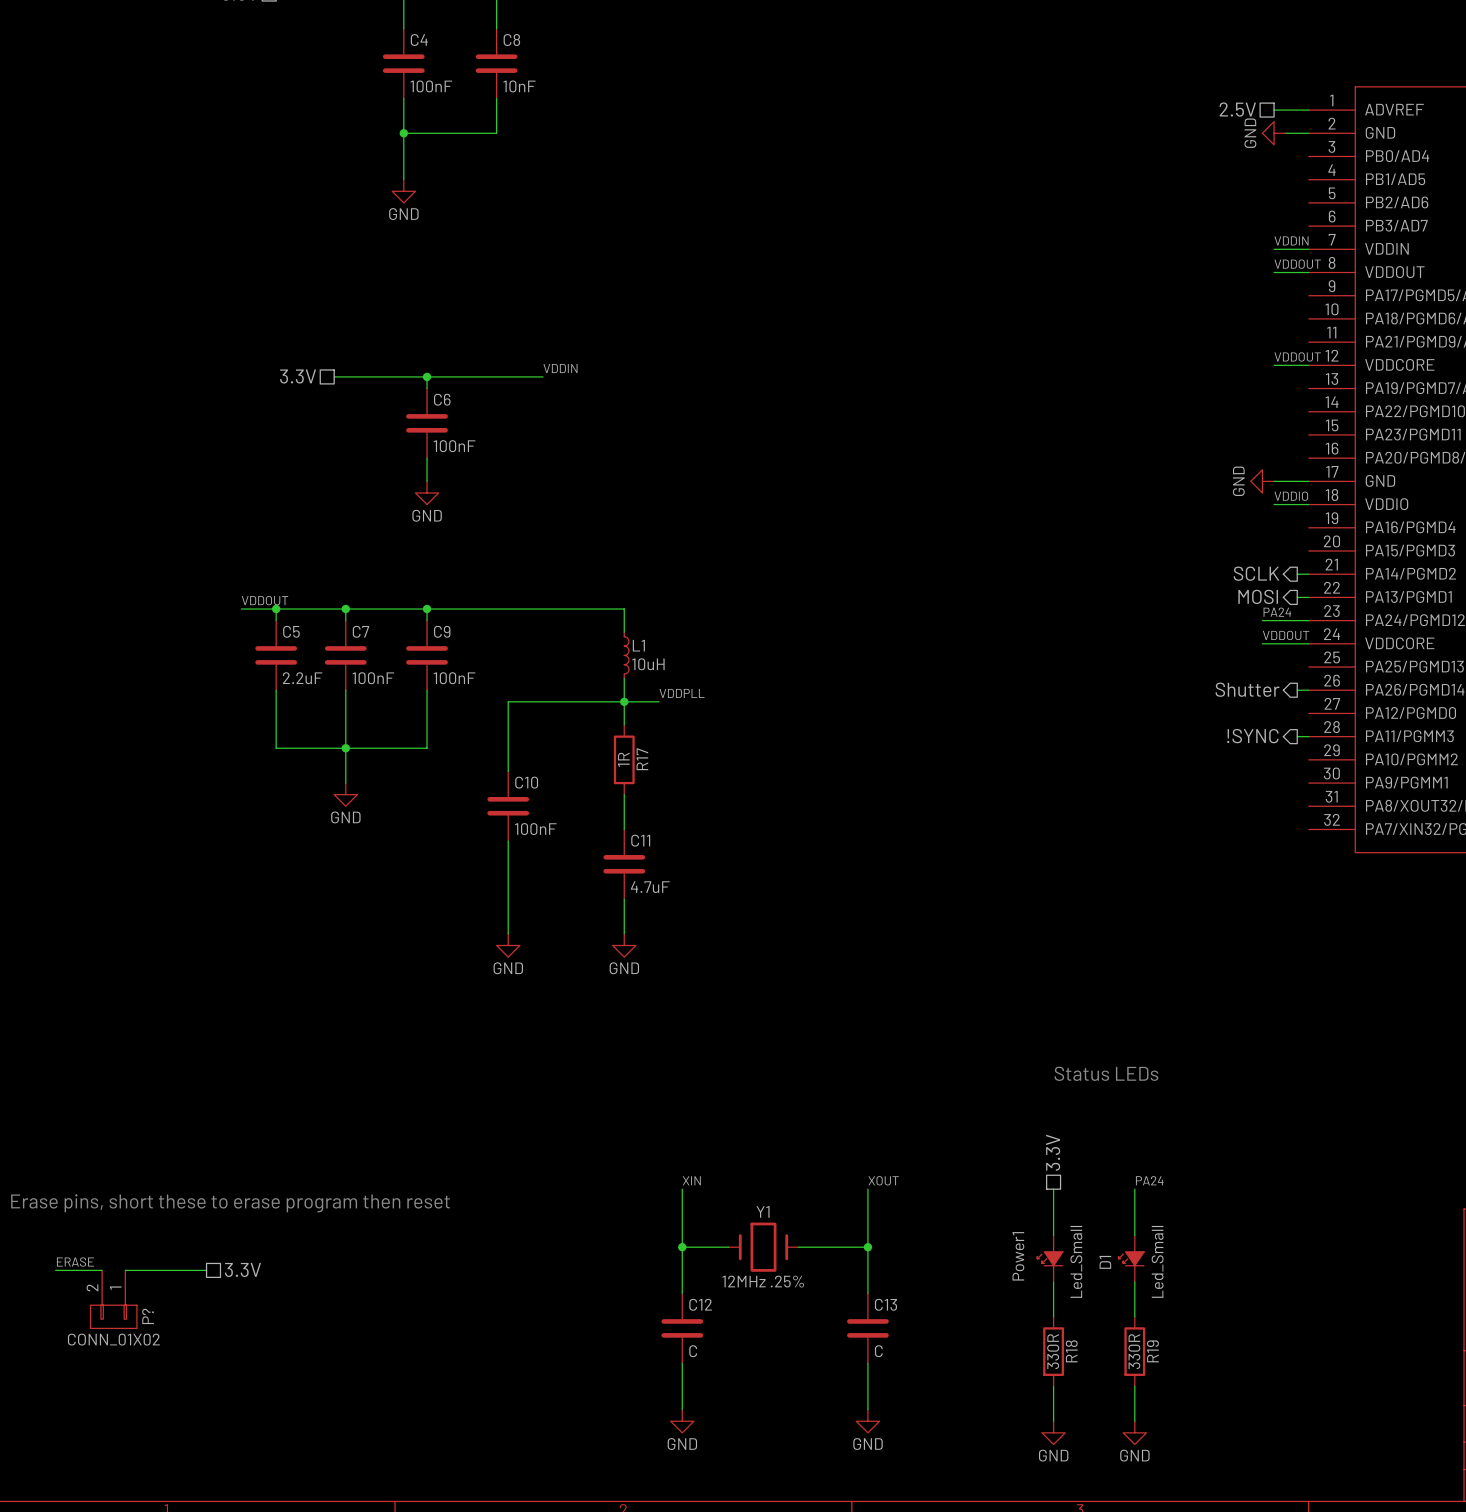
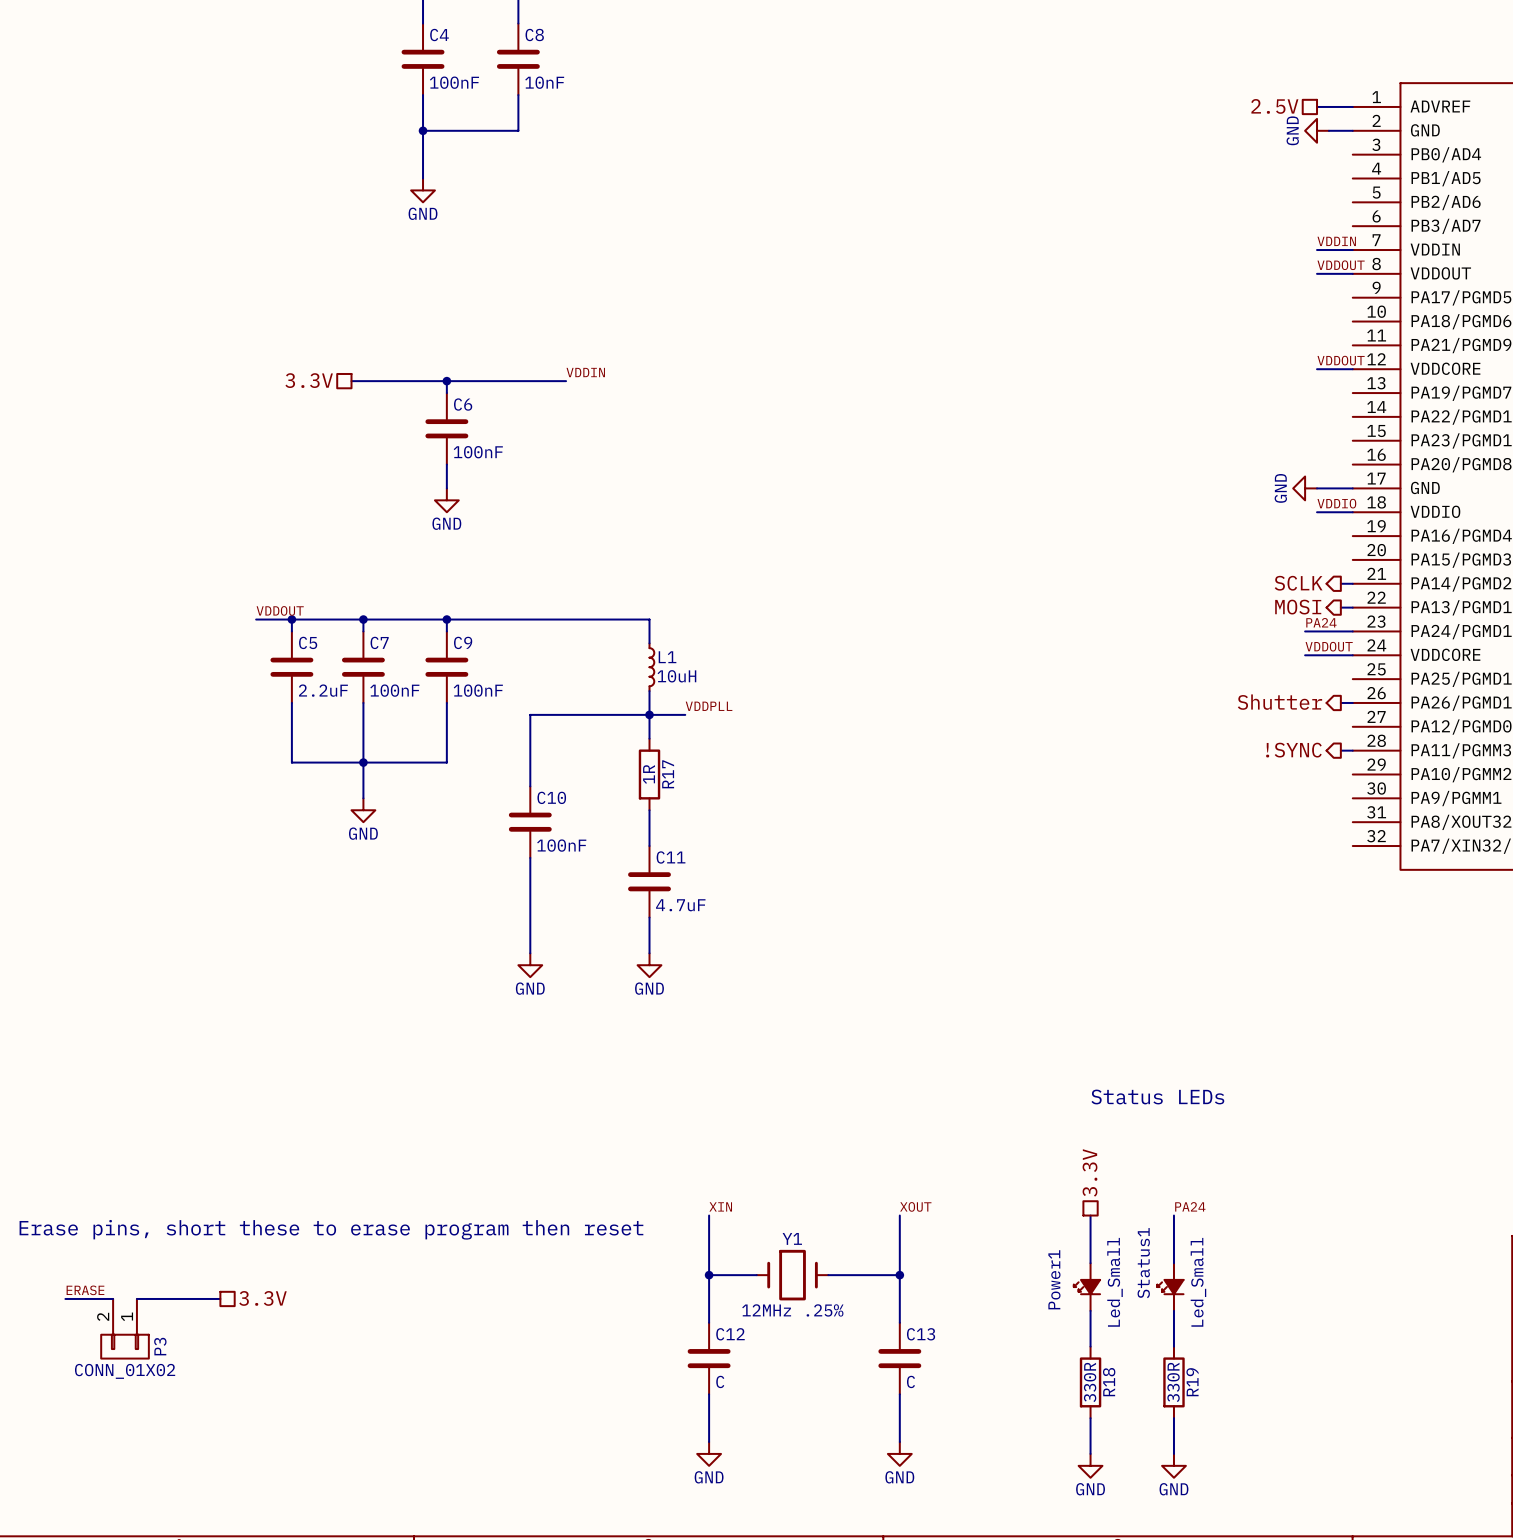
D1 name: D1 (1105, 1262) -> Status1 (1143, 1263)
P? name: P? (148, 1316) -> P3 (160, 1346)

